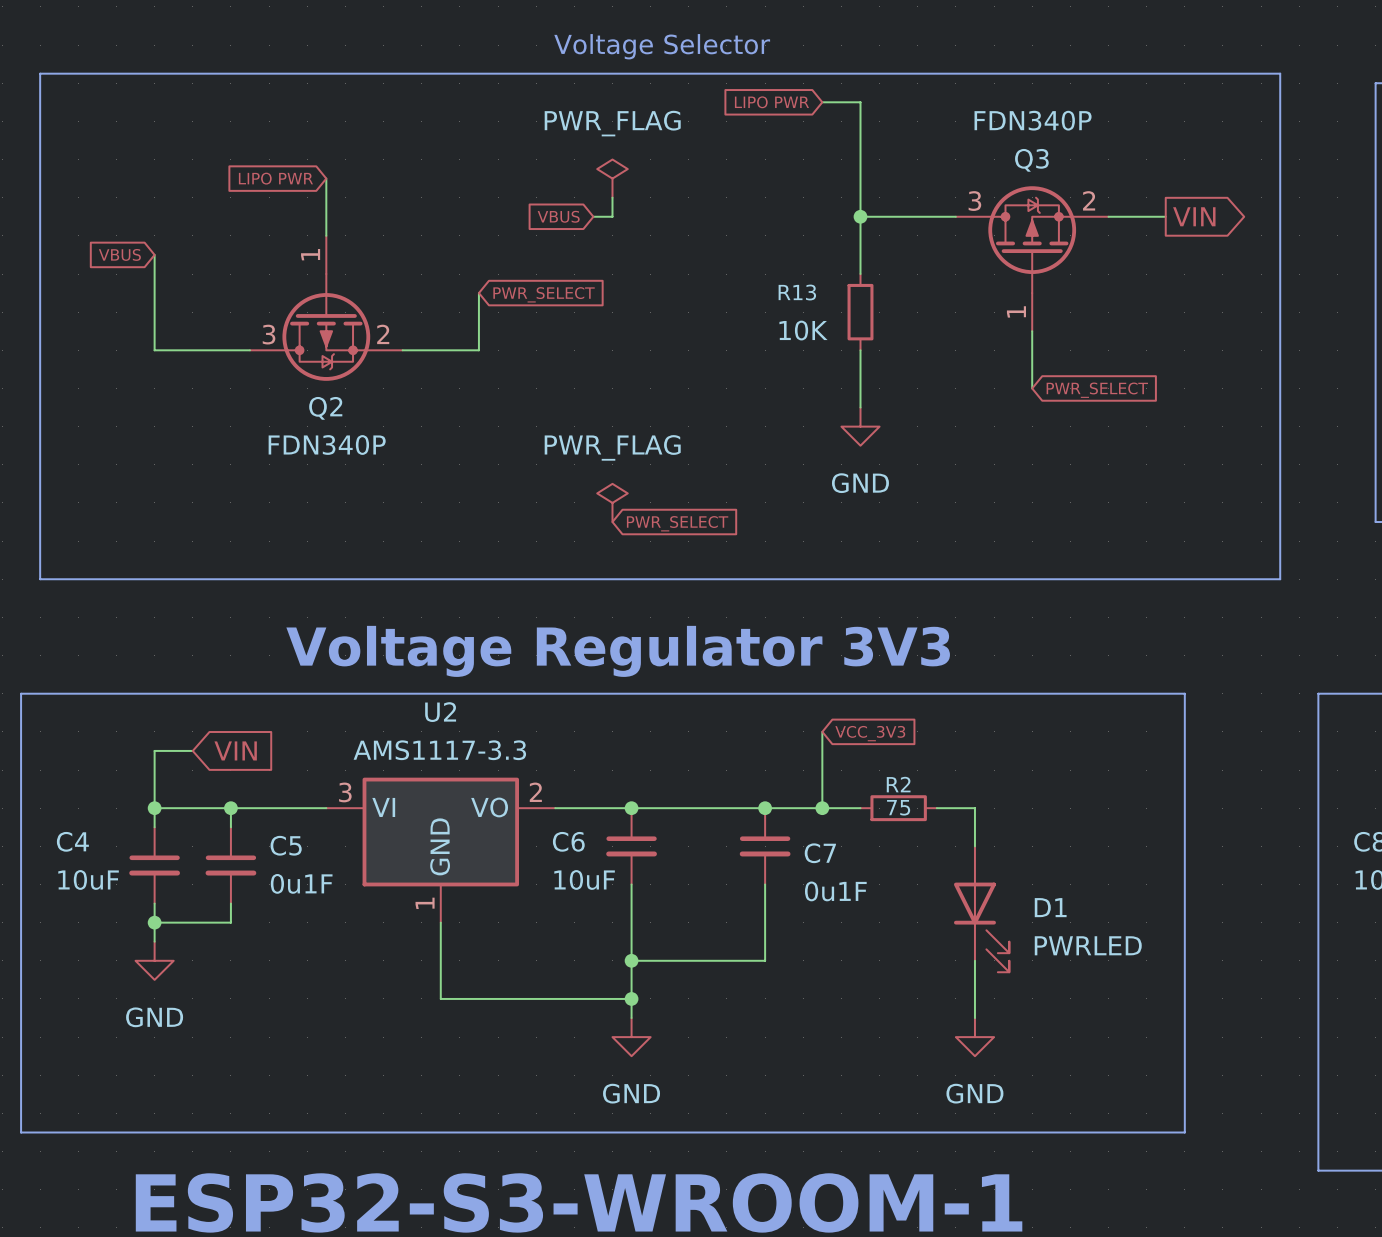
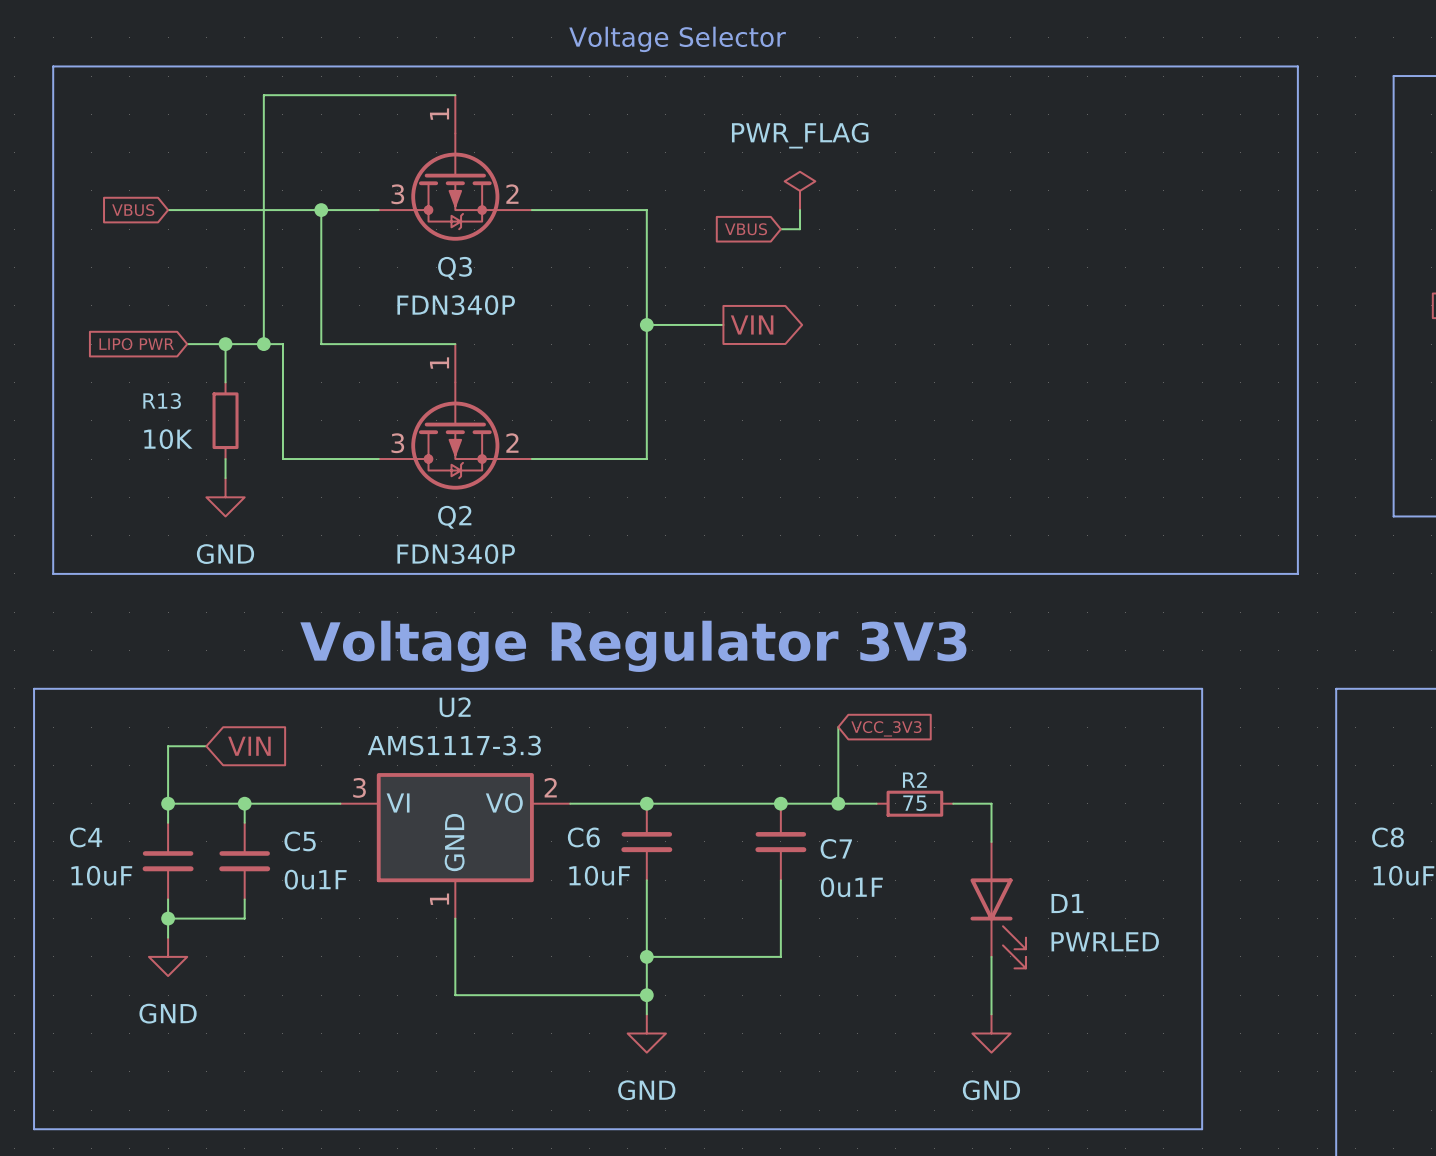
wire: none -> (455, 95) (263, 95) (263, 344) (282, 344) (282, 459) (378, 459)
global label: LIPO PWR (771, 102) -> none
wire: (822, 102) (860, 102) (860, 274) -> none
global label position: LIPO PWR (275, 178) -> LIPO PWR (136, 344)
wire: (326, 178) (326, 235) -> none
power symbol position: PWR_FLAG (612, 178) -> PWR_FLAG (800, 190)
wire: (612, 197) (612, 216) -> (531, 459) (646, 459) (646, 210) (627, 210)
wire: none -> (168, 210) (378, 210)
wire: none -> (321, 210) (321, 344) (417, 344)
junction: none -> (321, 210)
wire: none -> (531, 210) (608, 210)
global label position: VBUS (558, 216) -> VBUS (745, 229)
wire: none -> (800, 210) (800, 229) (780, 229)
wire: (860, 216) (955, 216) -> none
junction: (860, 216) -> none
wire: (1108, 216) (1165, 216) -> none
global label: VIN (1194, 216) -> none
Q3 flip: as is (1032, 239) -> up-down (455, 187)
global label position: VBUS (119, 254) -> VBUS (133, 210)
wire: (154, 254) (154, 350) (173, 350) -> none
Q3 position: (1032, 258) -> (455, 167)
wire: (478, 293) (478, 350) (440, 350) -> none
global label: PWR_SELECT (544, 294) -> none
Q2 position: (326, 308) -> (455, 416)
R13 position: (860, 312) -> (225, 420)
wire: none -> (646, 324) (723, 324)
junction: none -> (646, 324)
global label: none -> VIN (752, 324)
wire: (1032, 331) (1032, 388) -> none
wire: none -> (225, 344) (225, 382)
junction: none -> (225, 344)
junction: none -> (263, 344)
wire: (860, 350) (860, 407) -> none
global label: PWR_SELECT (1097, 390) -> none
power symbol: GND (860, 426) -> none
wire: none -> (225, 459) (225, 478)
power symbol: none -> GND (225, 497)
power symbol: PWR_FLAG (612, 502) -> none
global label: PWR_SELECT (677, 523) -> none

